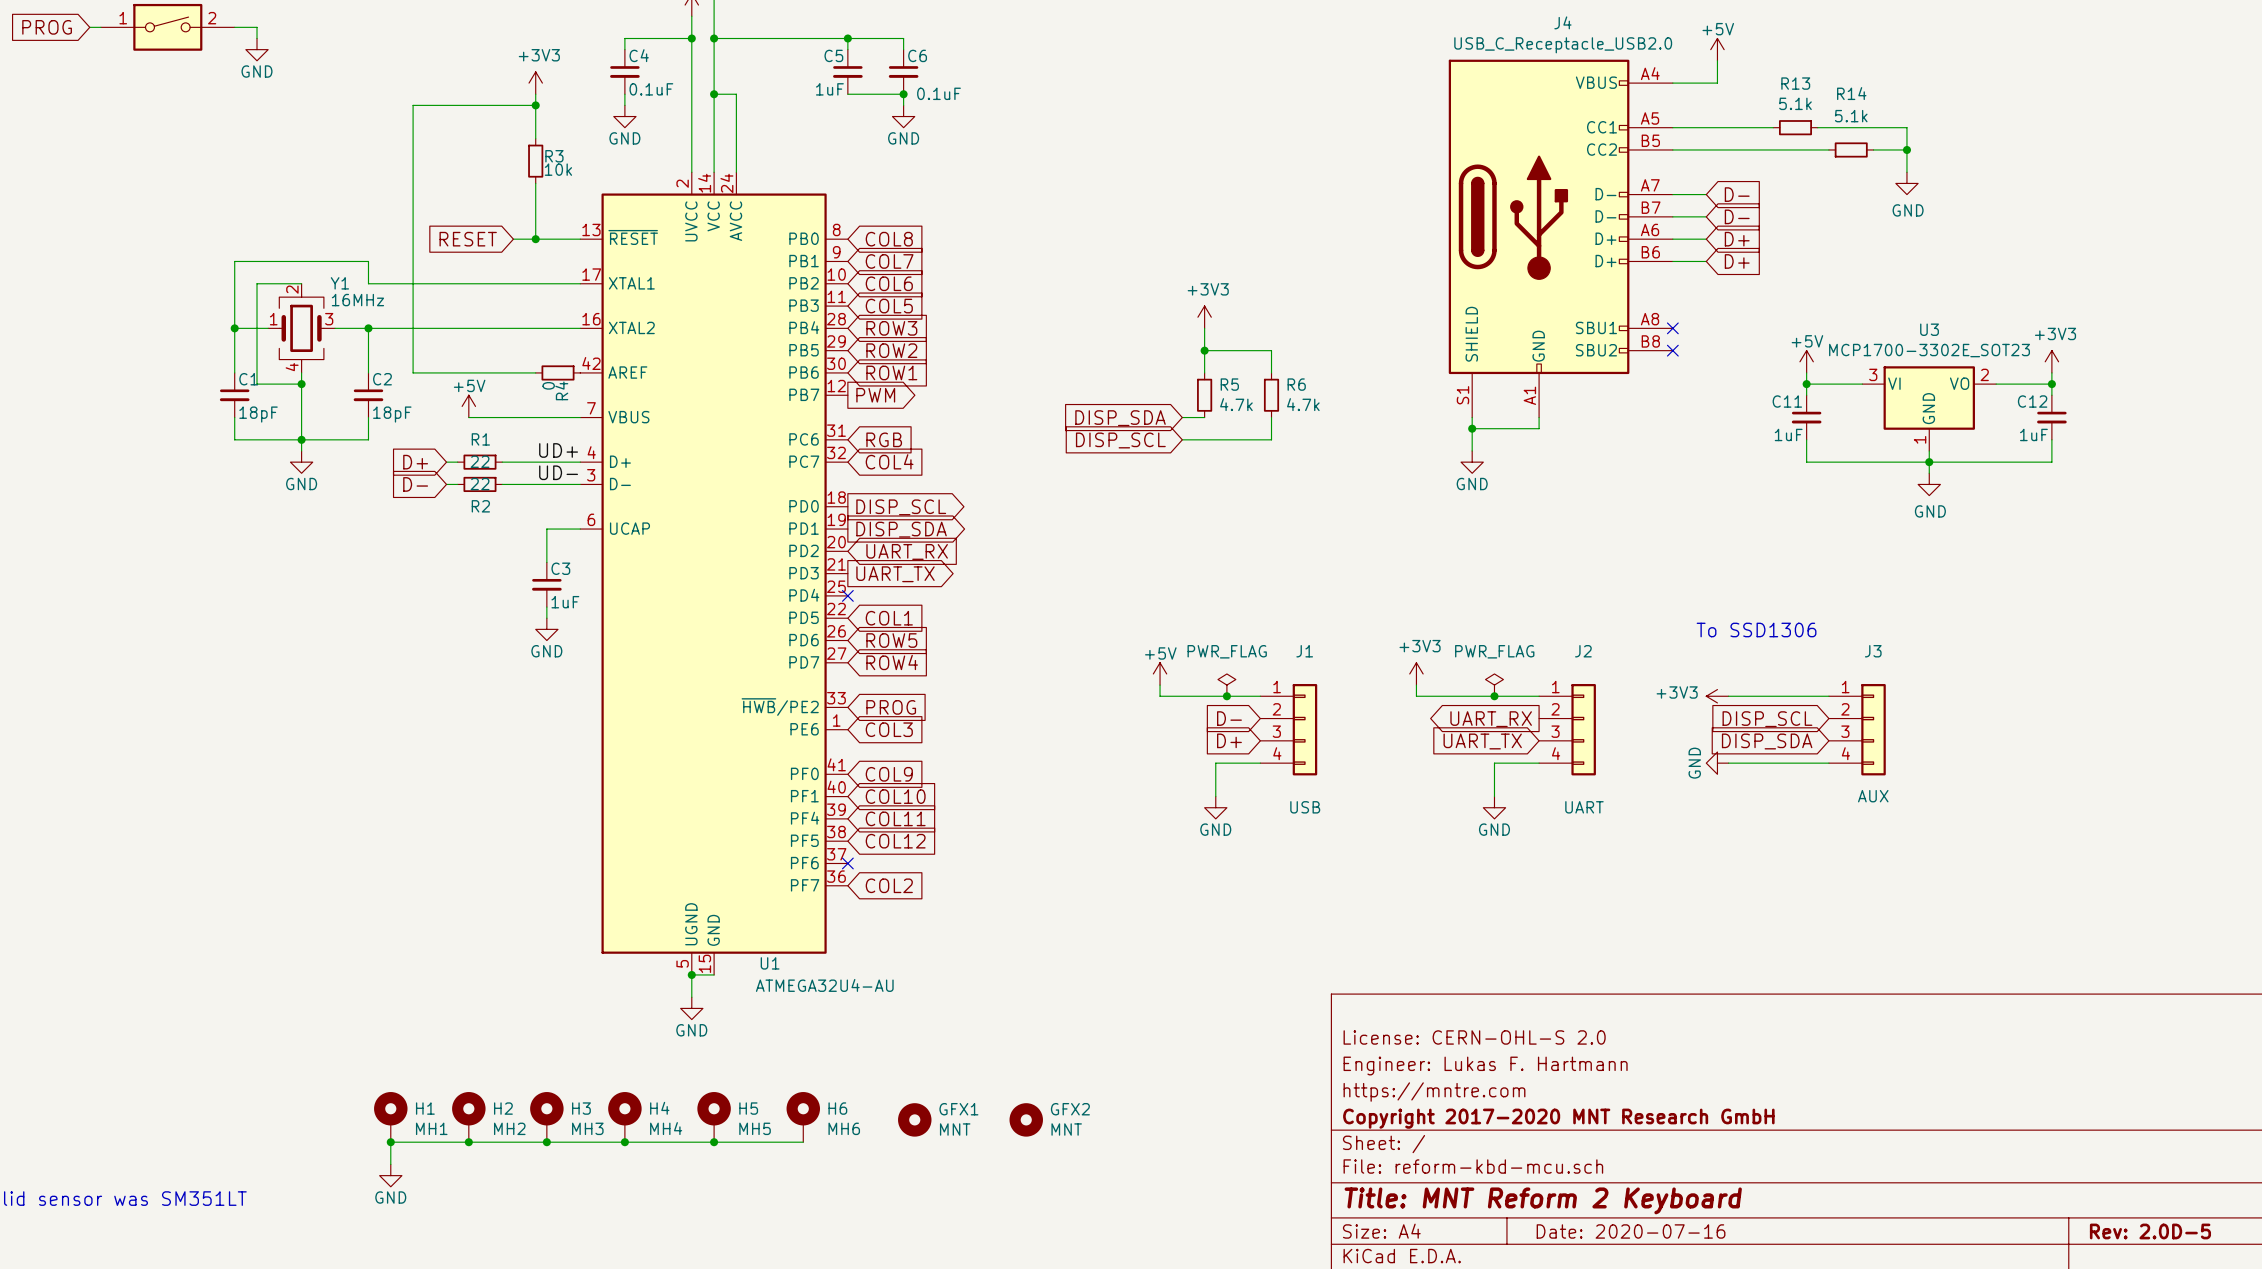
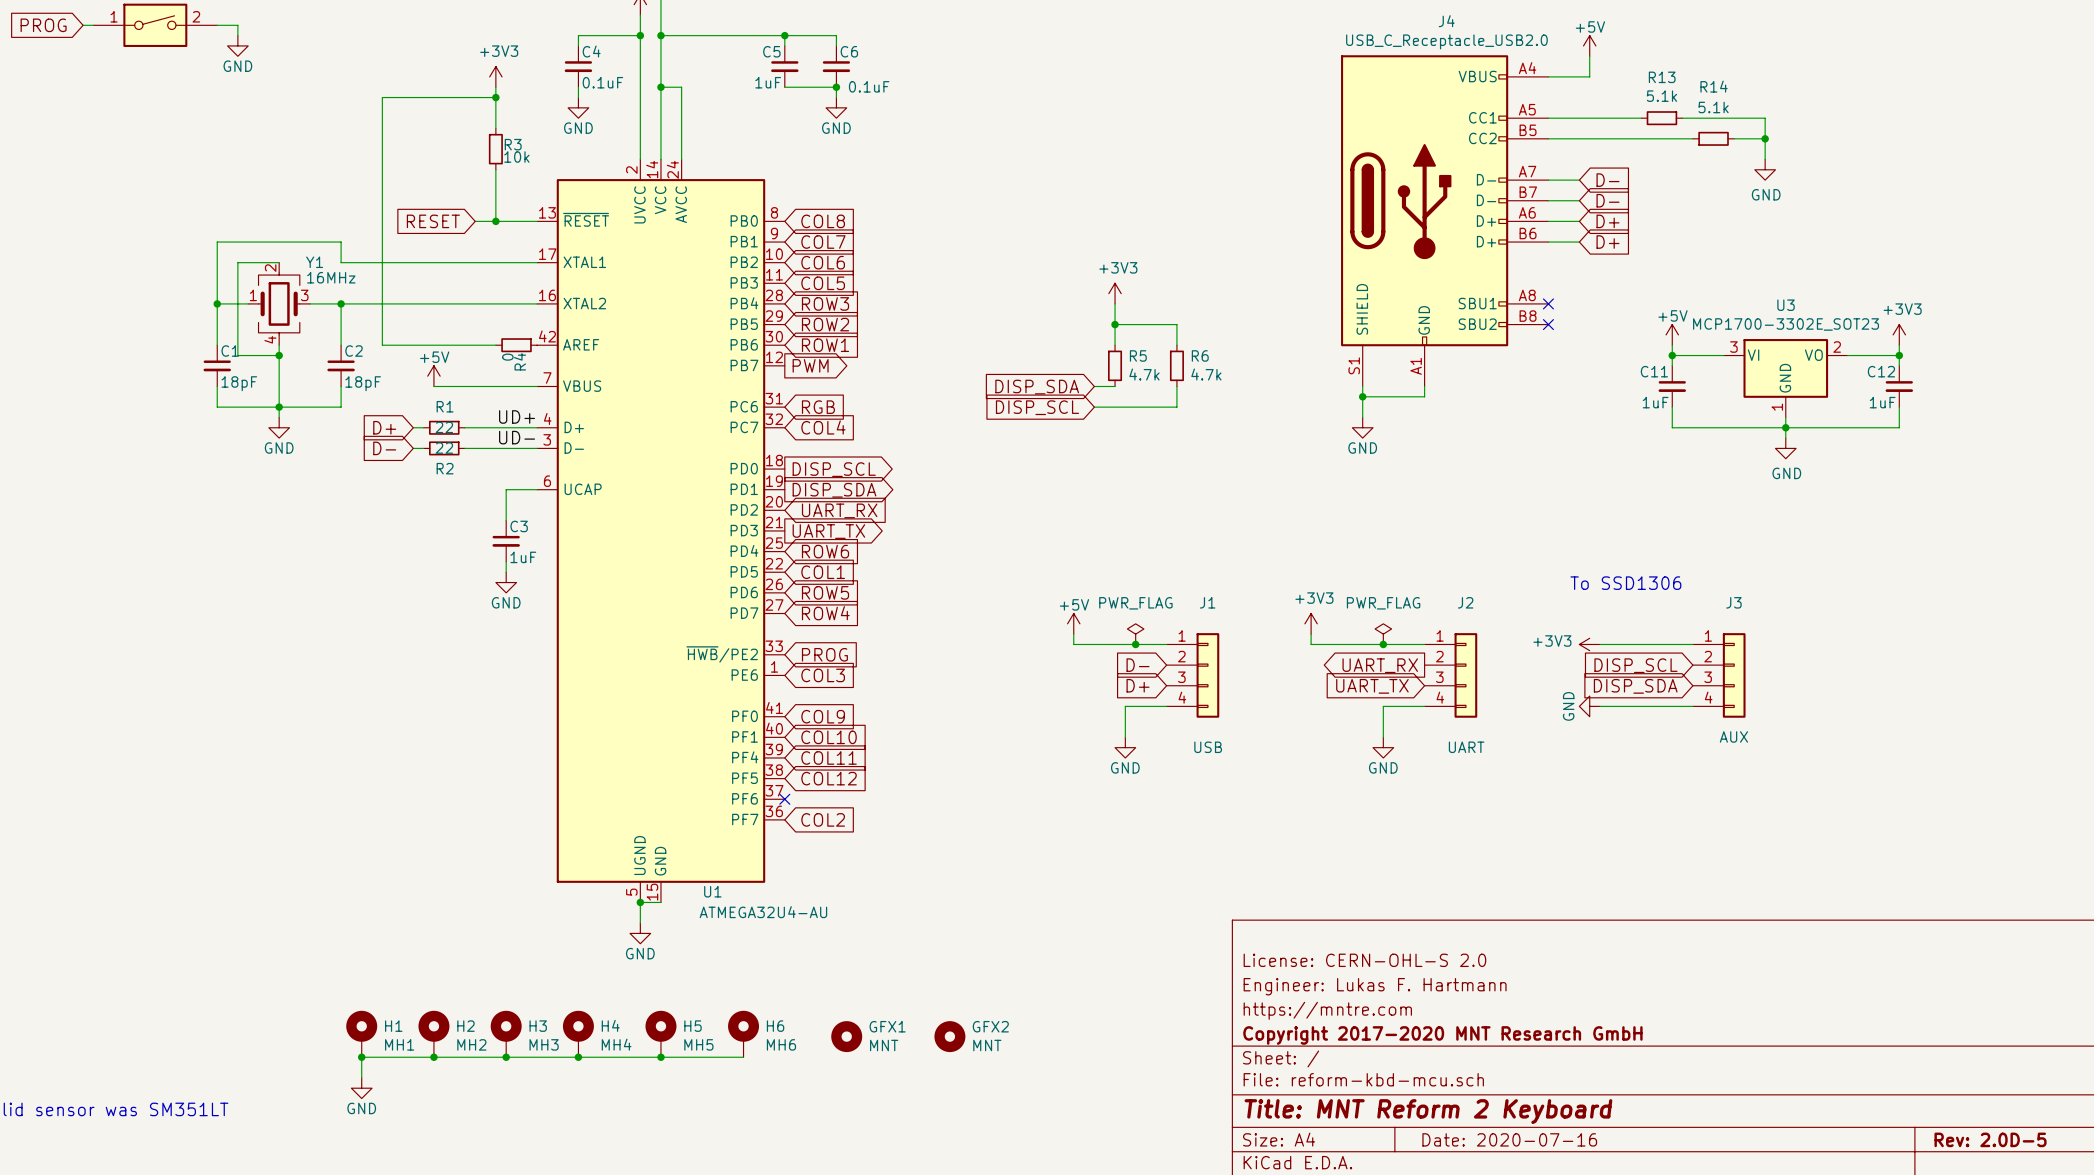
no-connect mark: (847, 595) -> none
global label: none -> ROW6 (825, 551)

